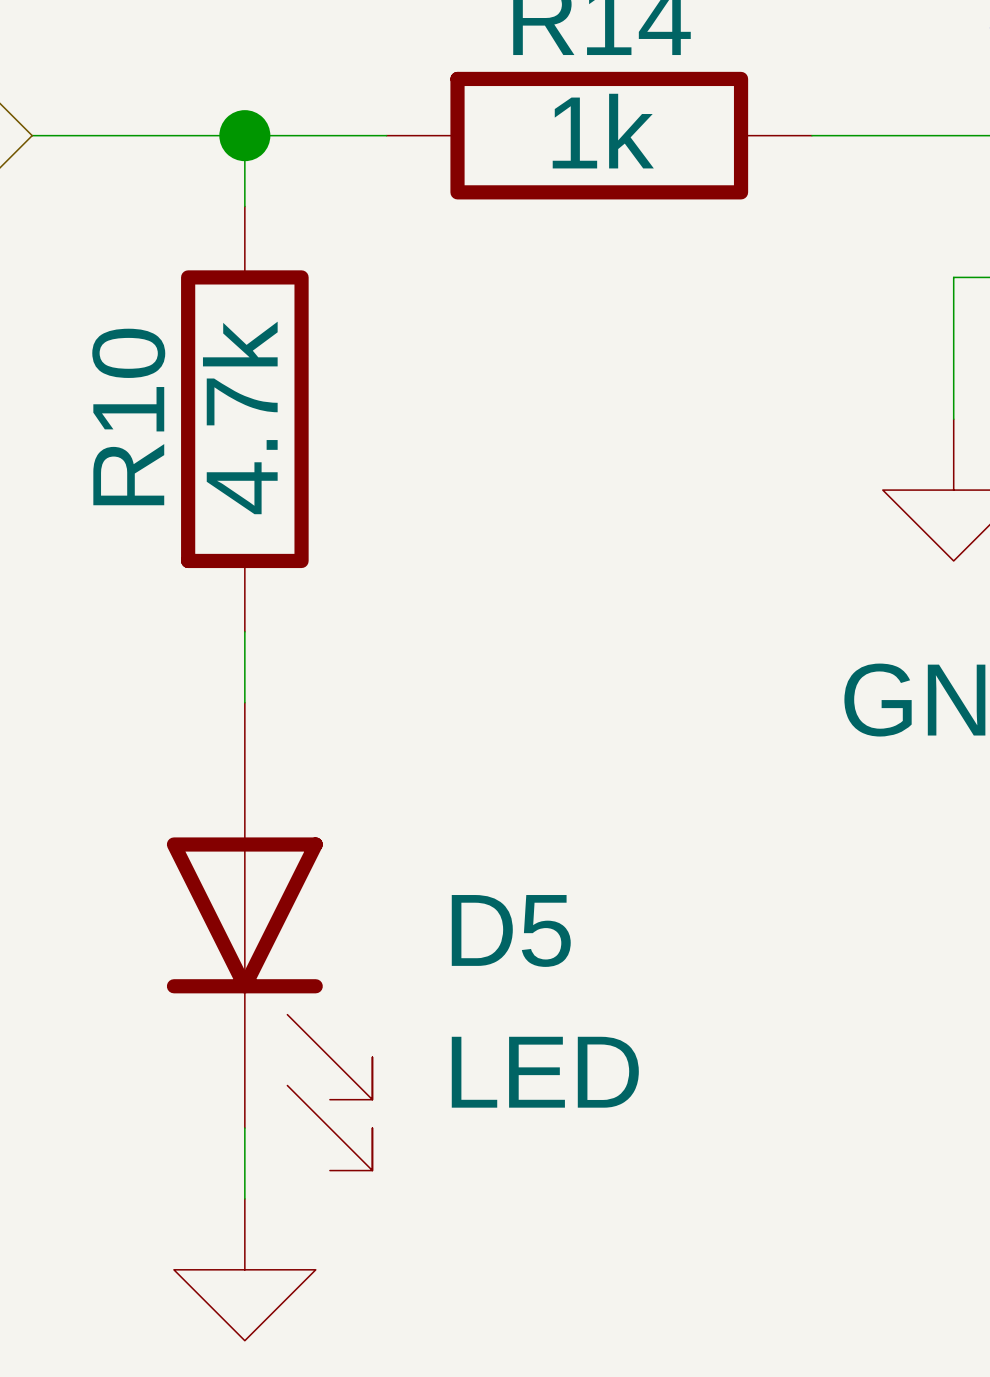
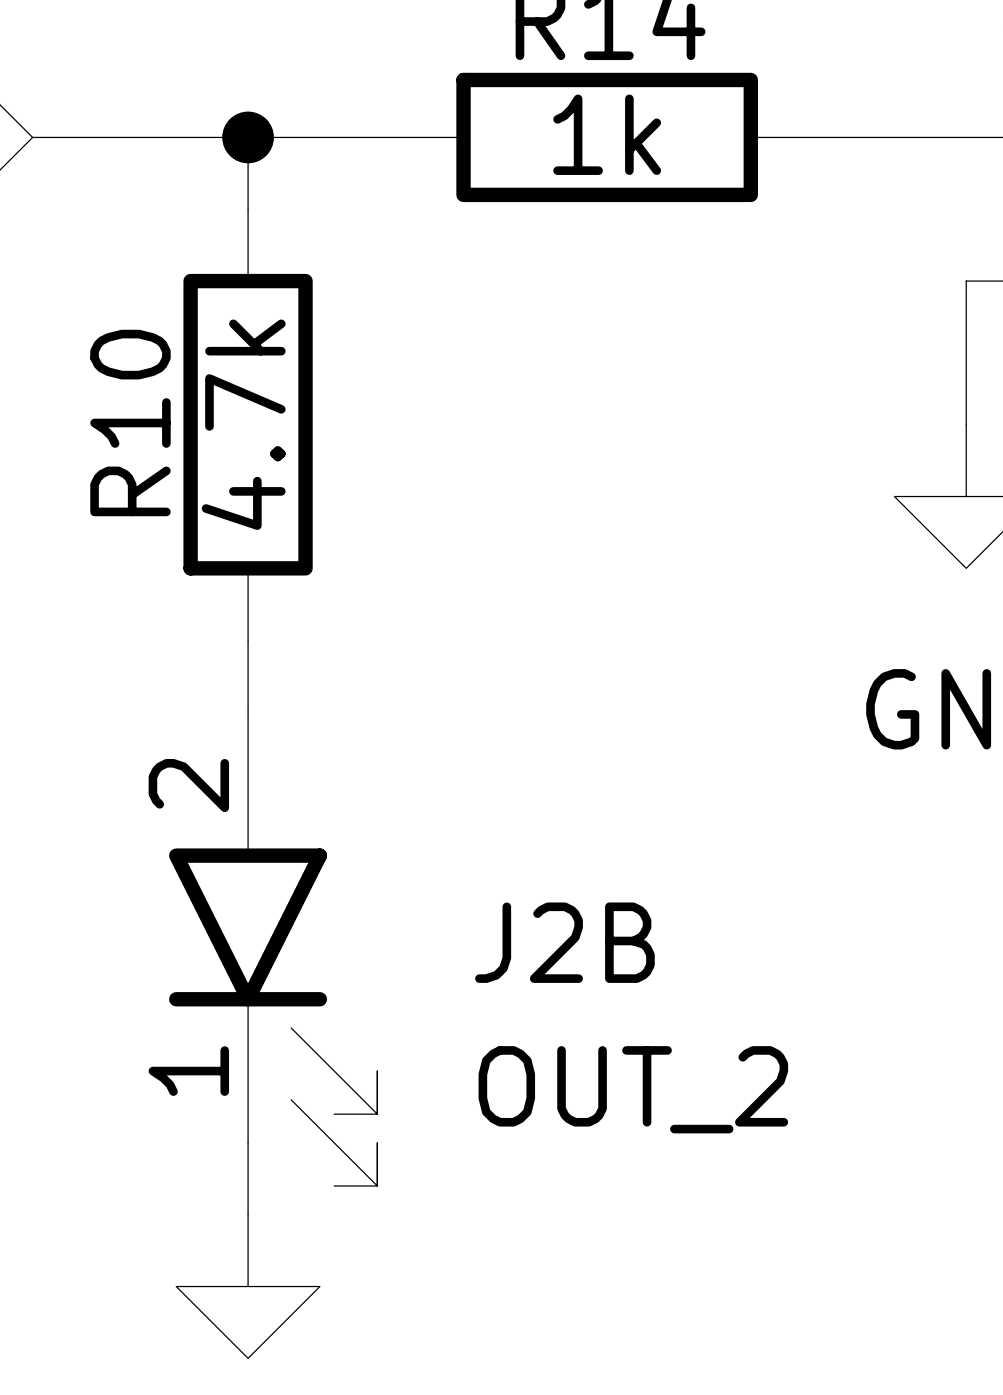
D5: LED (269, 936) -> none
J2B: none -> OUT_2 (273, 948)

